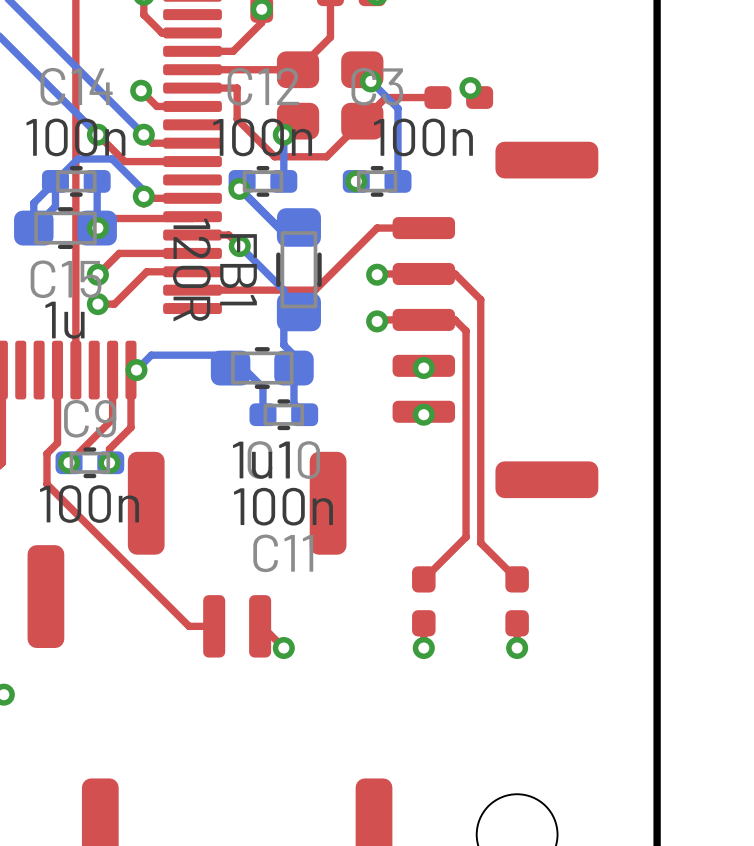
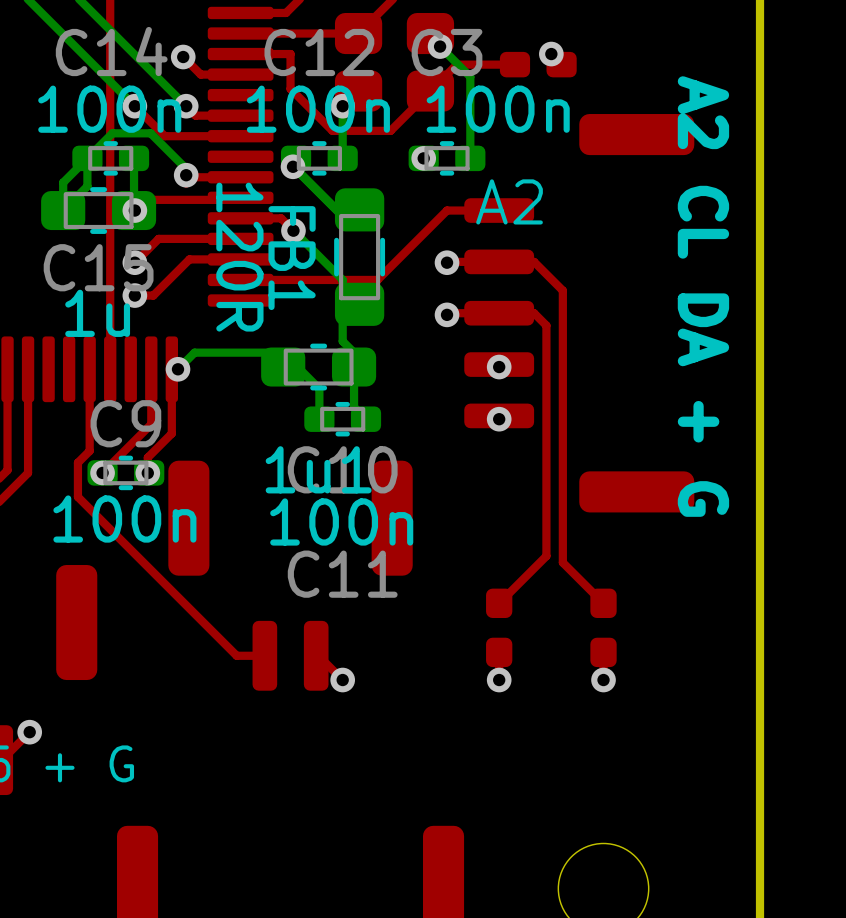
text: none -> A2 (509, 201)
text: none -> A2 CL DA + G (703, 296)

